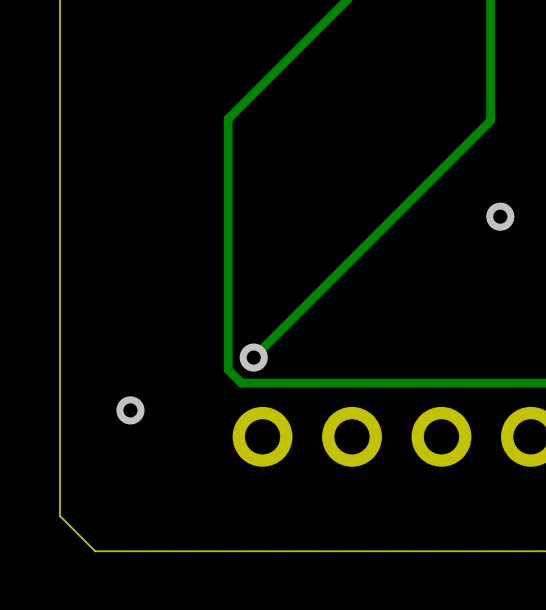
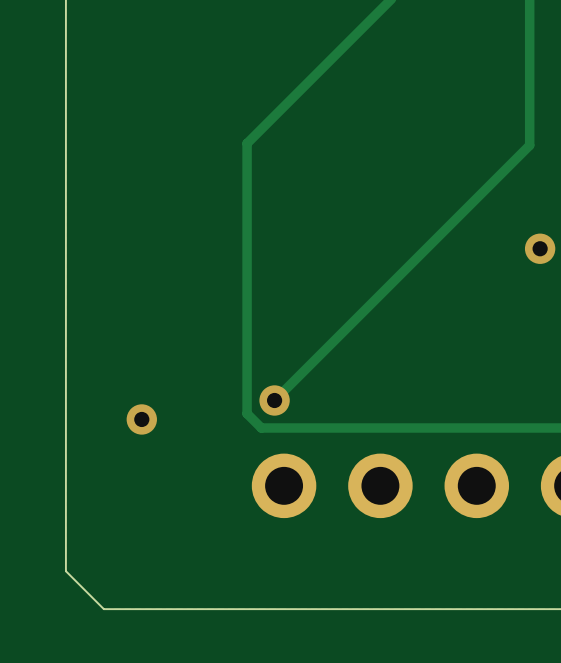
via position: (130, 410) -> (141, 419)

